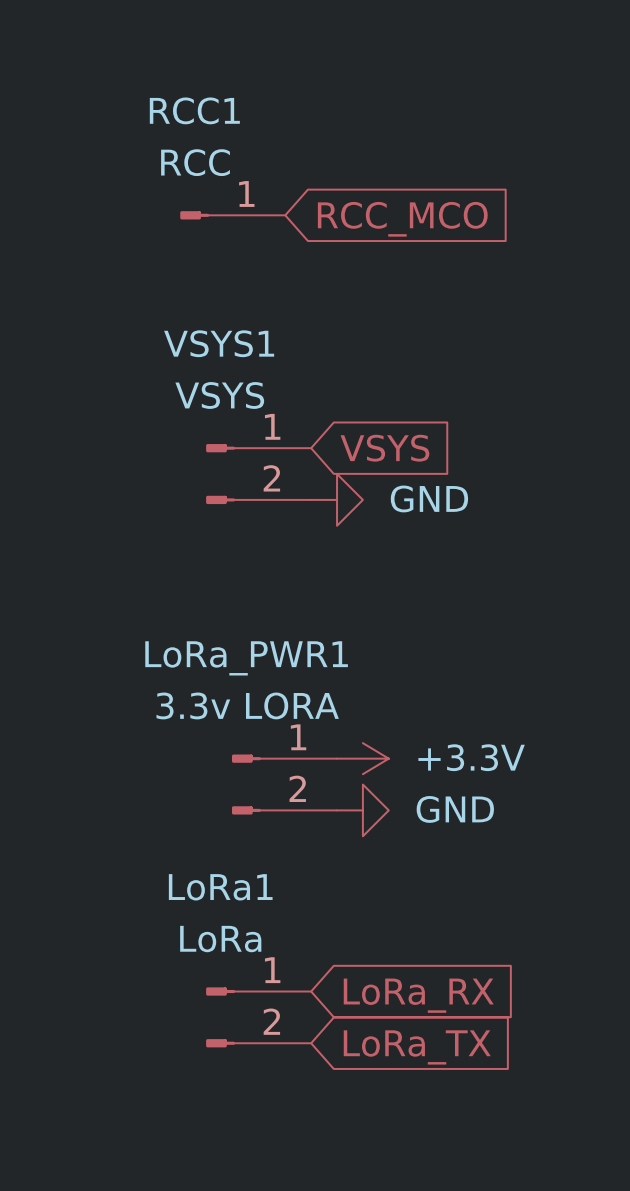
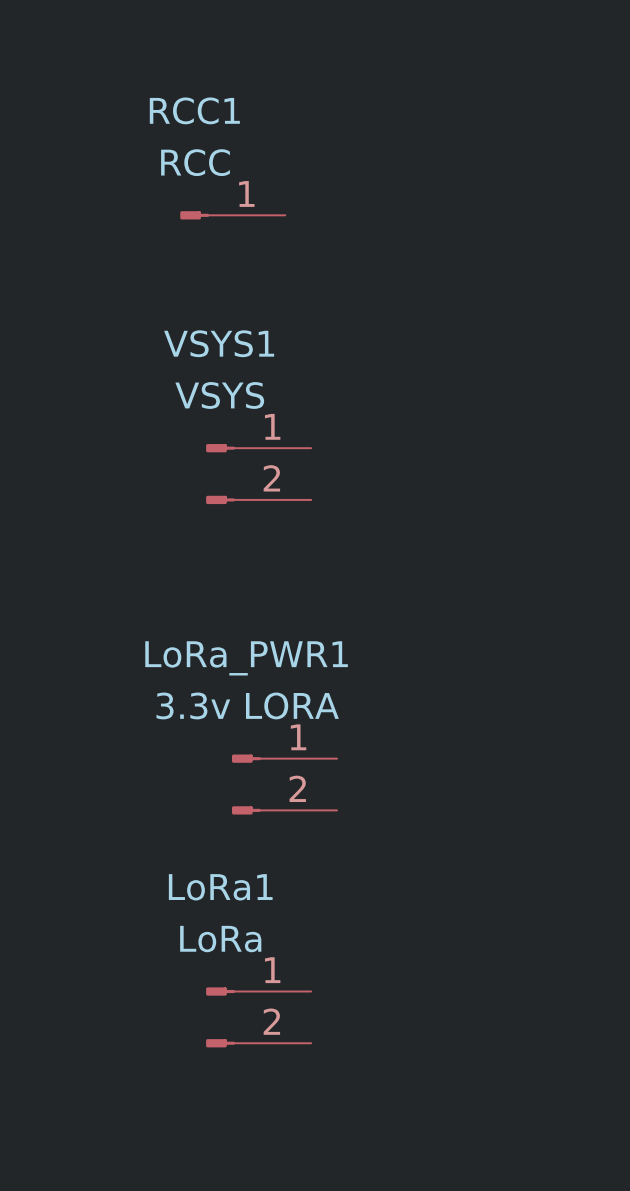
global label: RCC_MCO (402, 219) -> none
global label: VSYS (384, 448) -> none
power symbol: GND (337, 499) -> none
power symbol: +3.3V (362, 758) -> none
power symbol: GND (362, 810) -> none
global label: LoRa_RX (418, 995) -> none
global label: LoRa_TX (417, 1047) -> none

